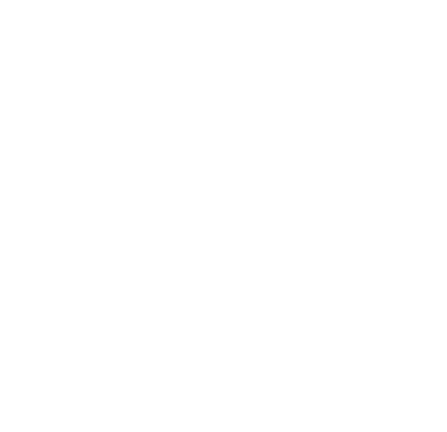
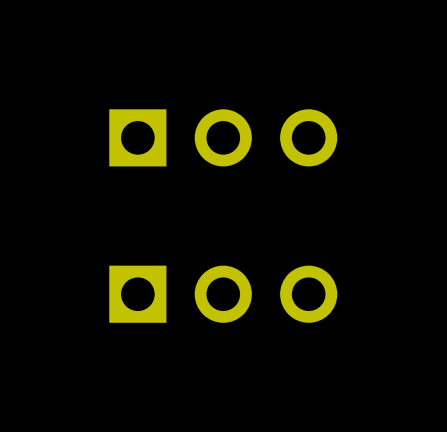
part: none -> (223, 137)
part: none -> (223, 294)

